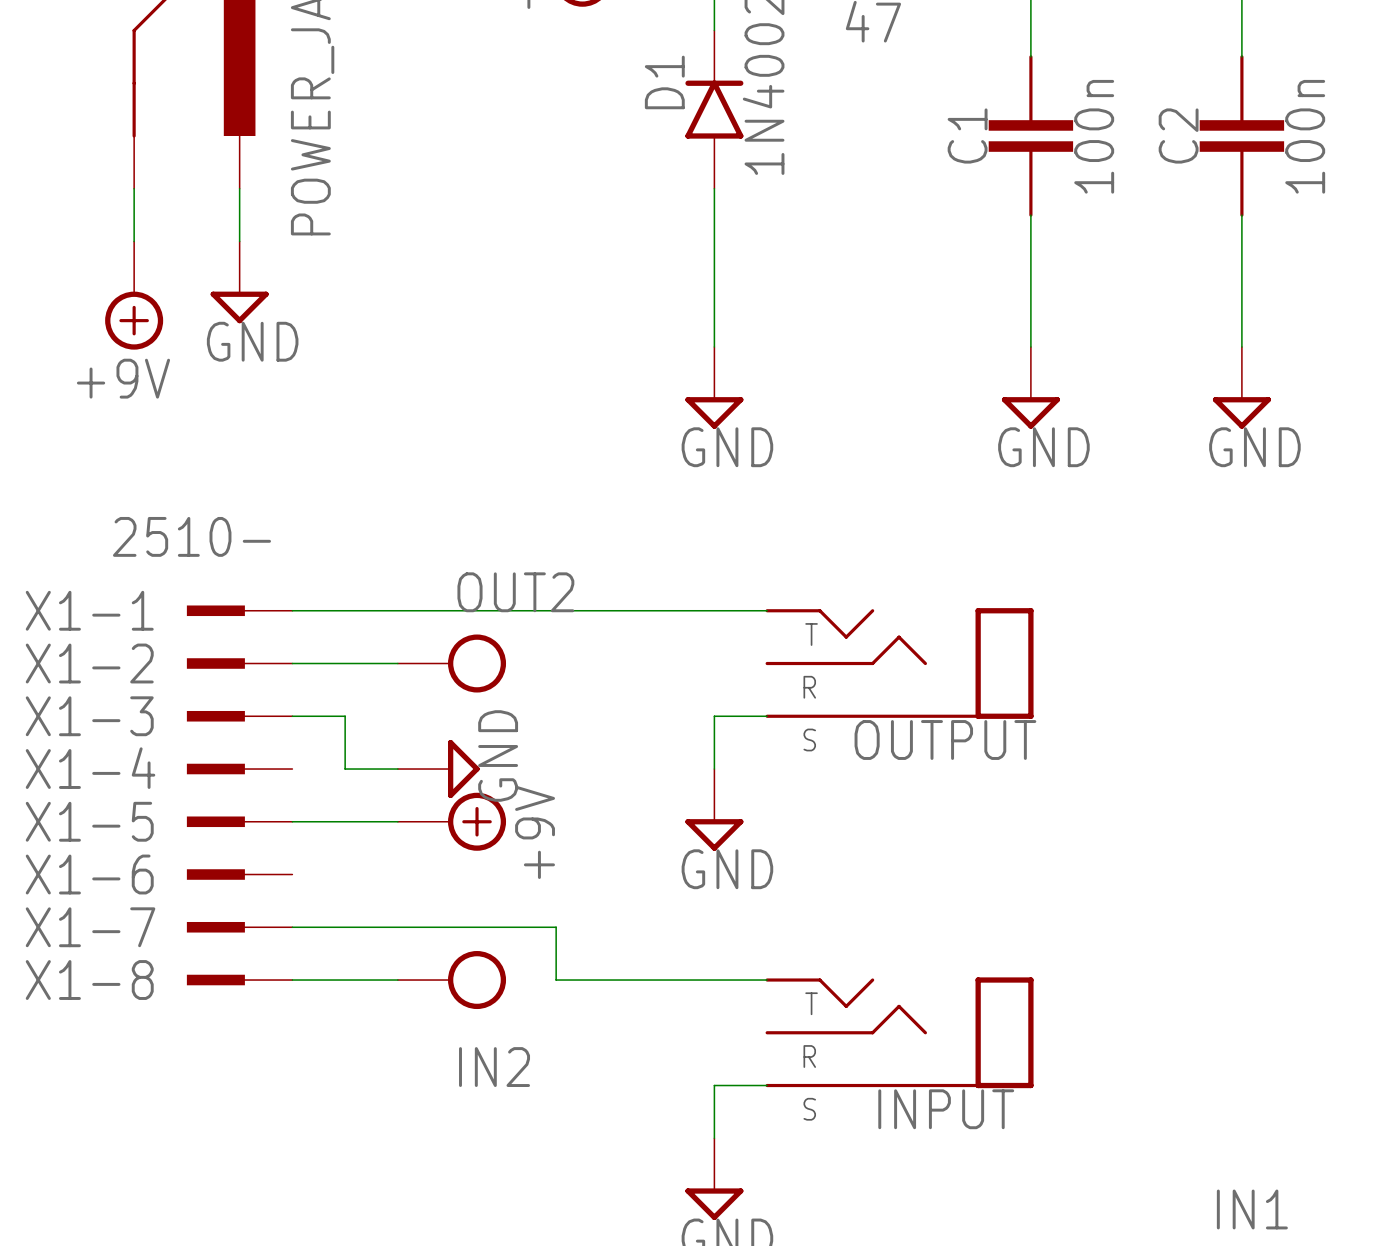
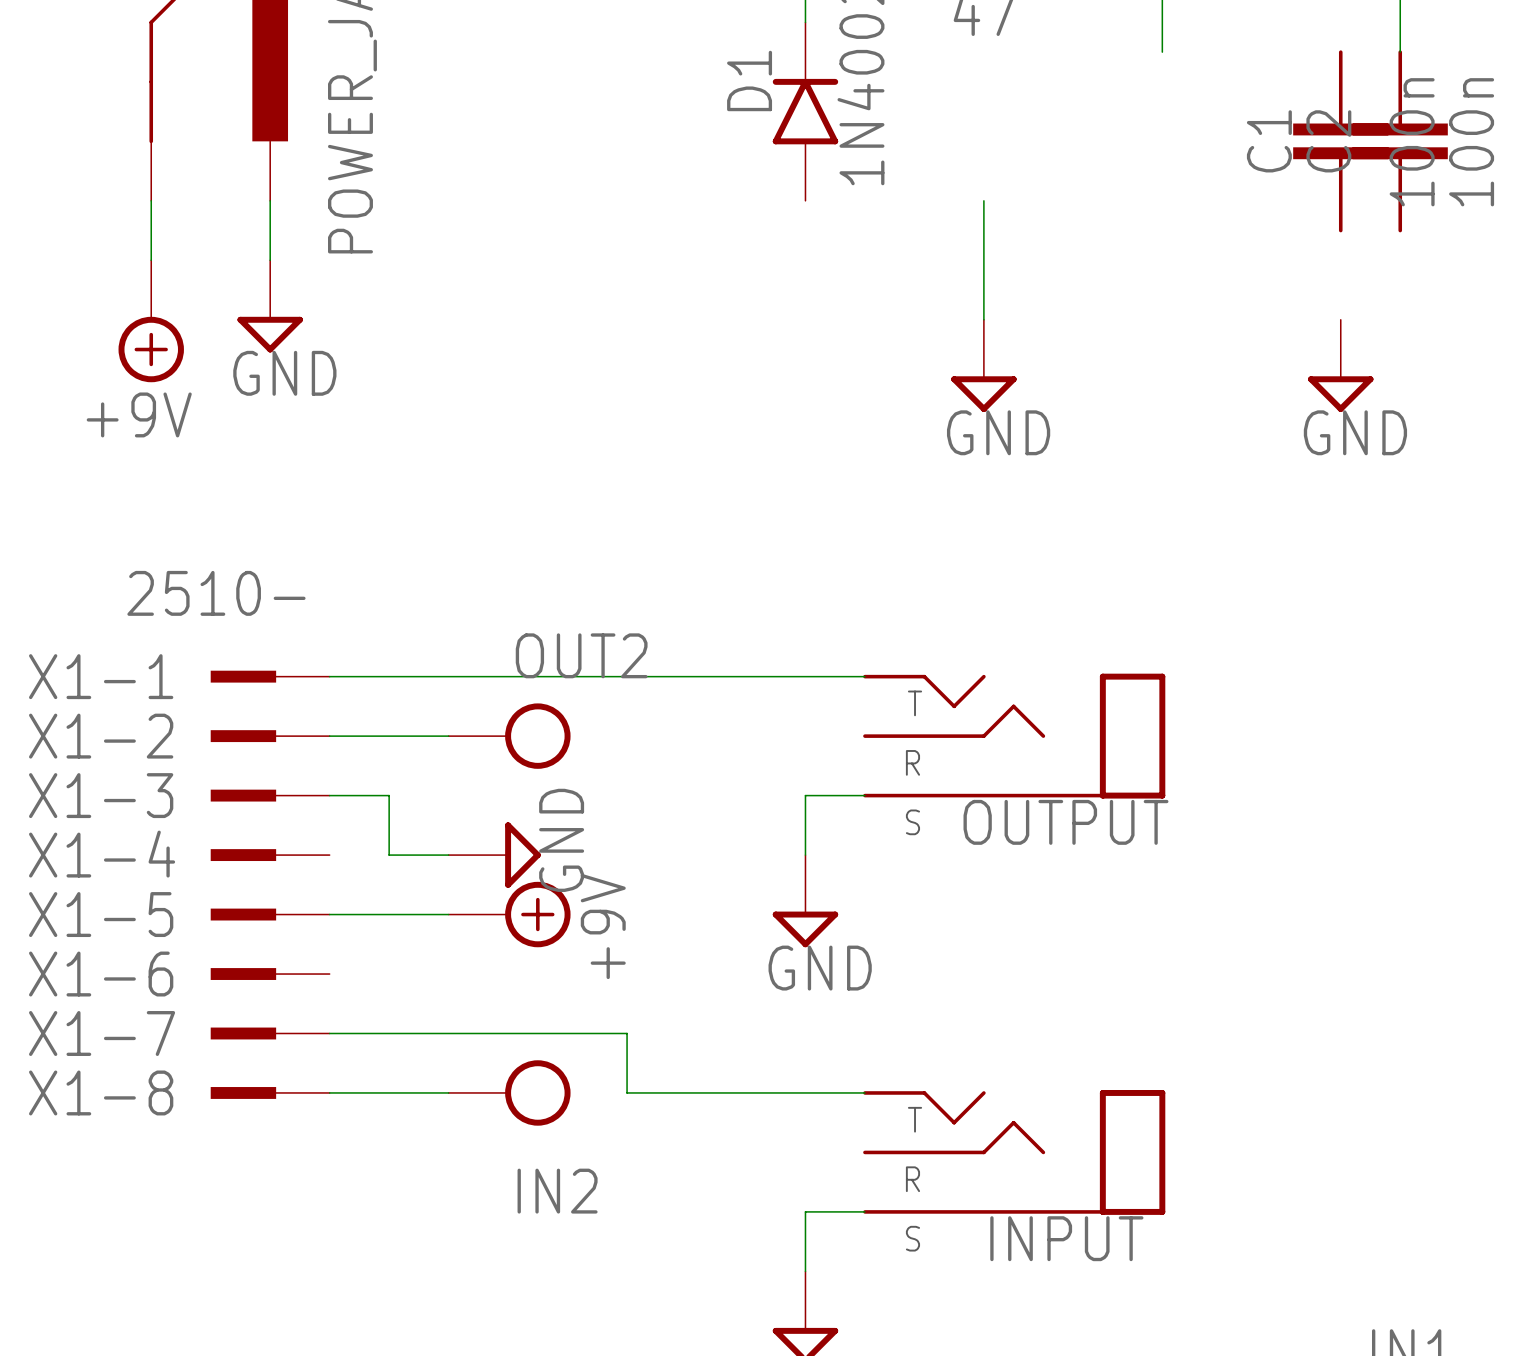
C1 position: (1030, 136) -> (1340, 141)
wire: (714, 188) (714, 347) -> none
wire: none -> (983, 200) (983, 319)
wire: (1030, 215) (1030, 347) -> none
wire: (1241, 215) (1241, 347) -> none
power symbol: none -> GND (983, 365)
power symbol: GND (714, 387) -> none
power symbol: GND (1030, 387) -> none
power symbol position: GND (1241, 387) -> GND (1340, 365)

